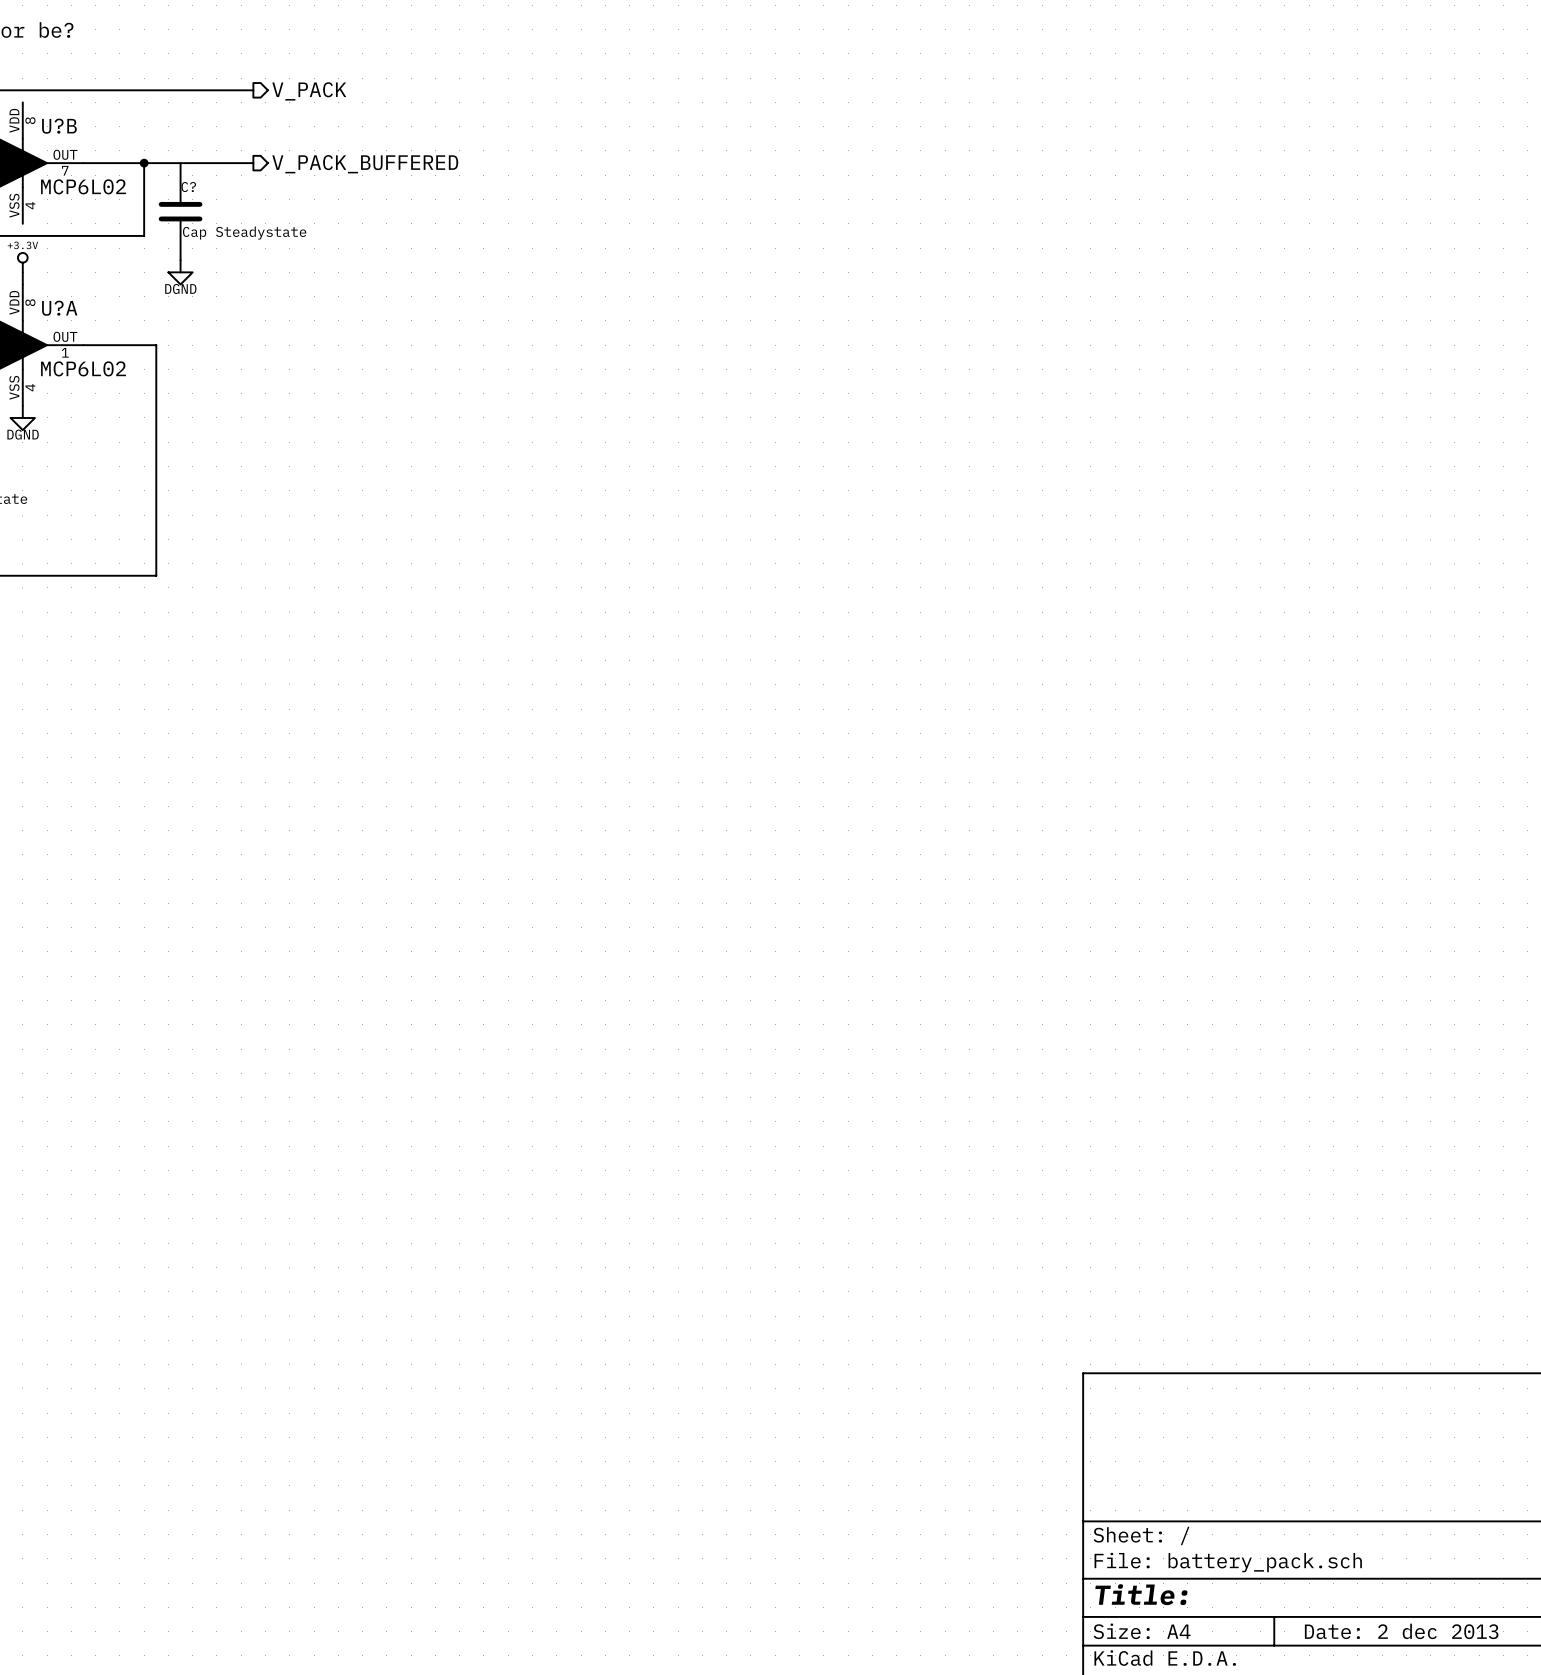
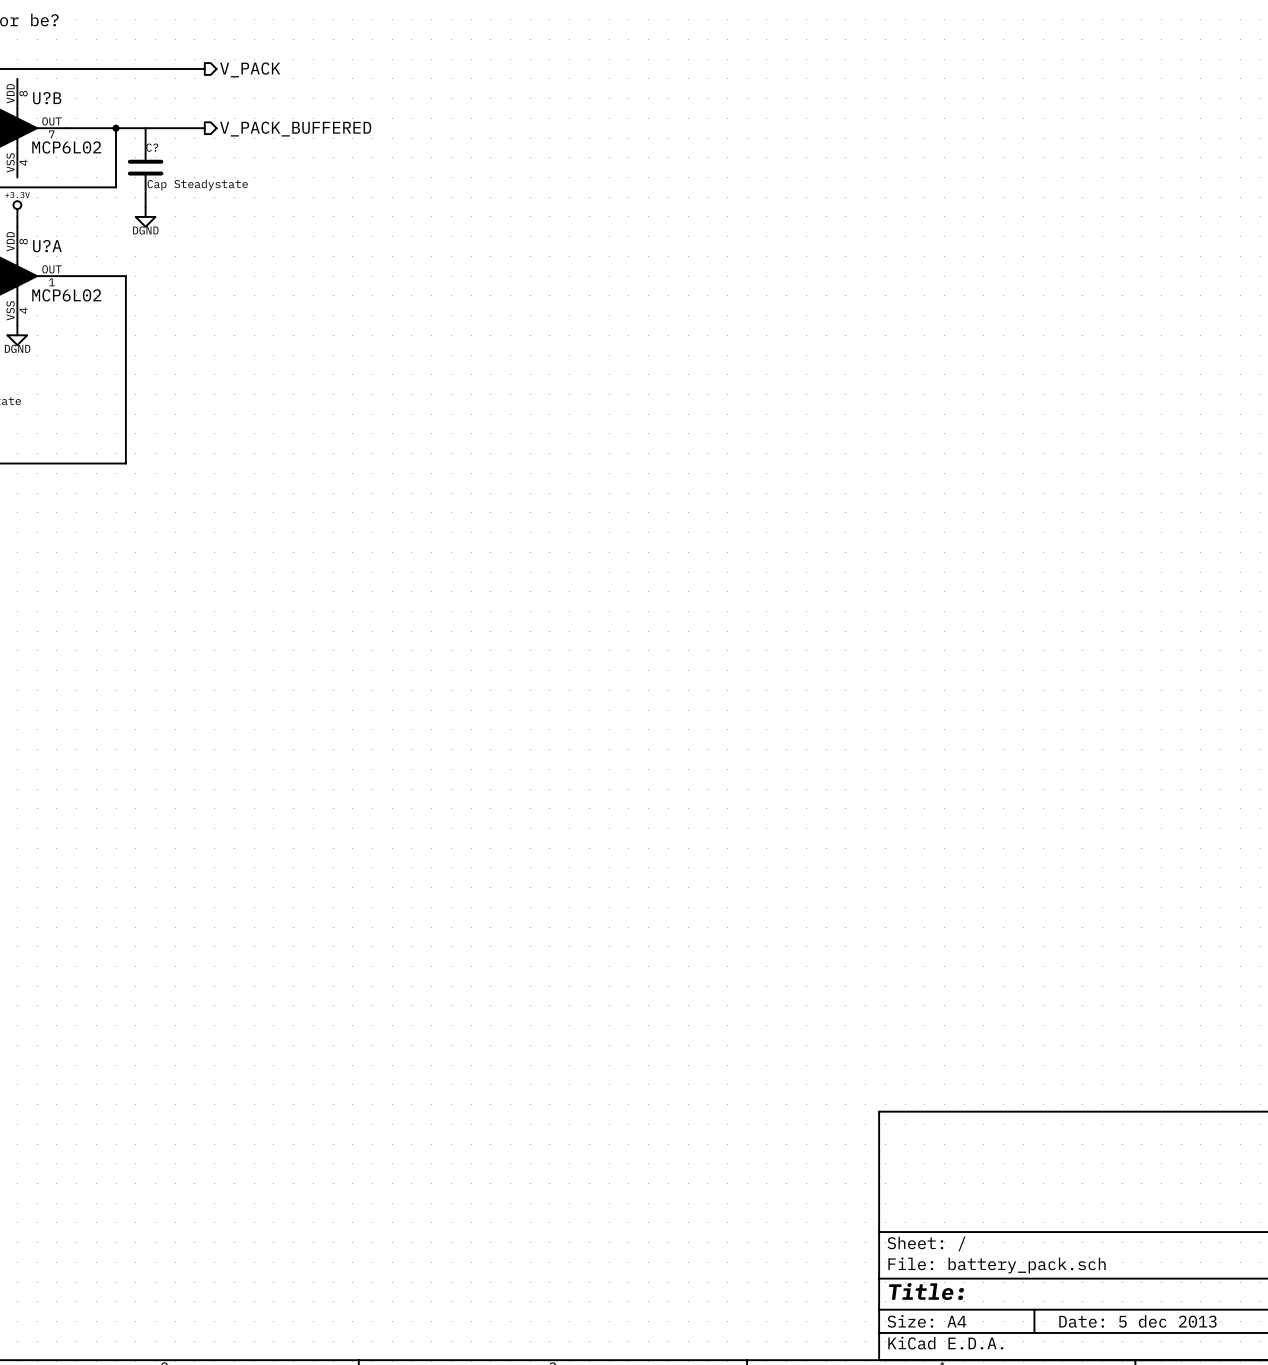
title block: Date: 2 dec 2013 (1401, 1631) -> Date: 5 dec 2013 (1137, 1321)

